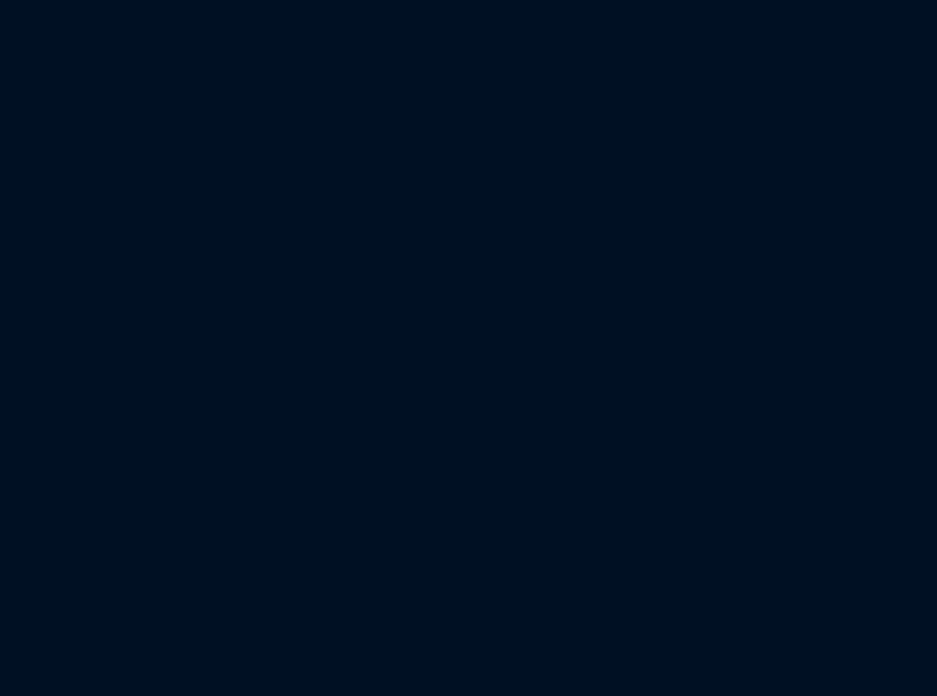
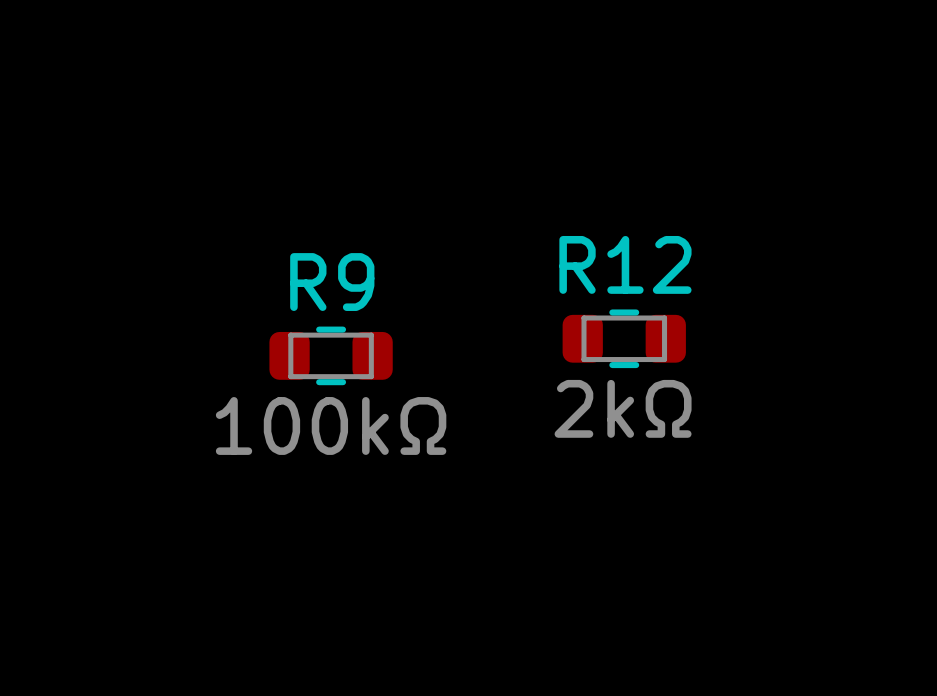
R12: none -> 2kΩ (624, 338)
R9: none -> 100kΩ (331, 355)

